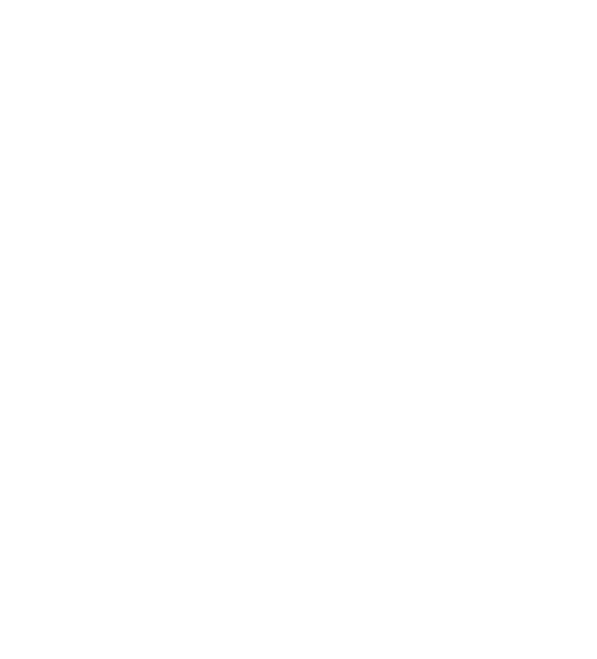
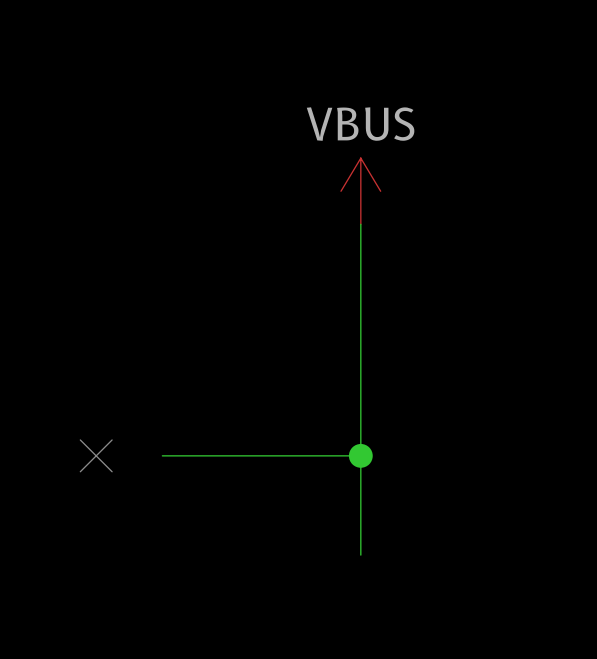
power symbol: none -> VBUS (360, 191)
wire: none -> (360, 224) (360, 555)
no-connect mark: none -> (96, 455)
wire: none -> (162, 455) (360, 455)
junction: none -> (360, 455)

